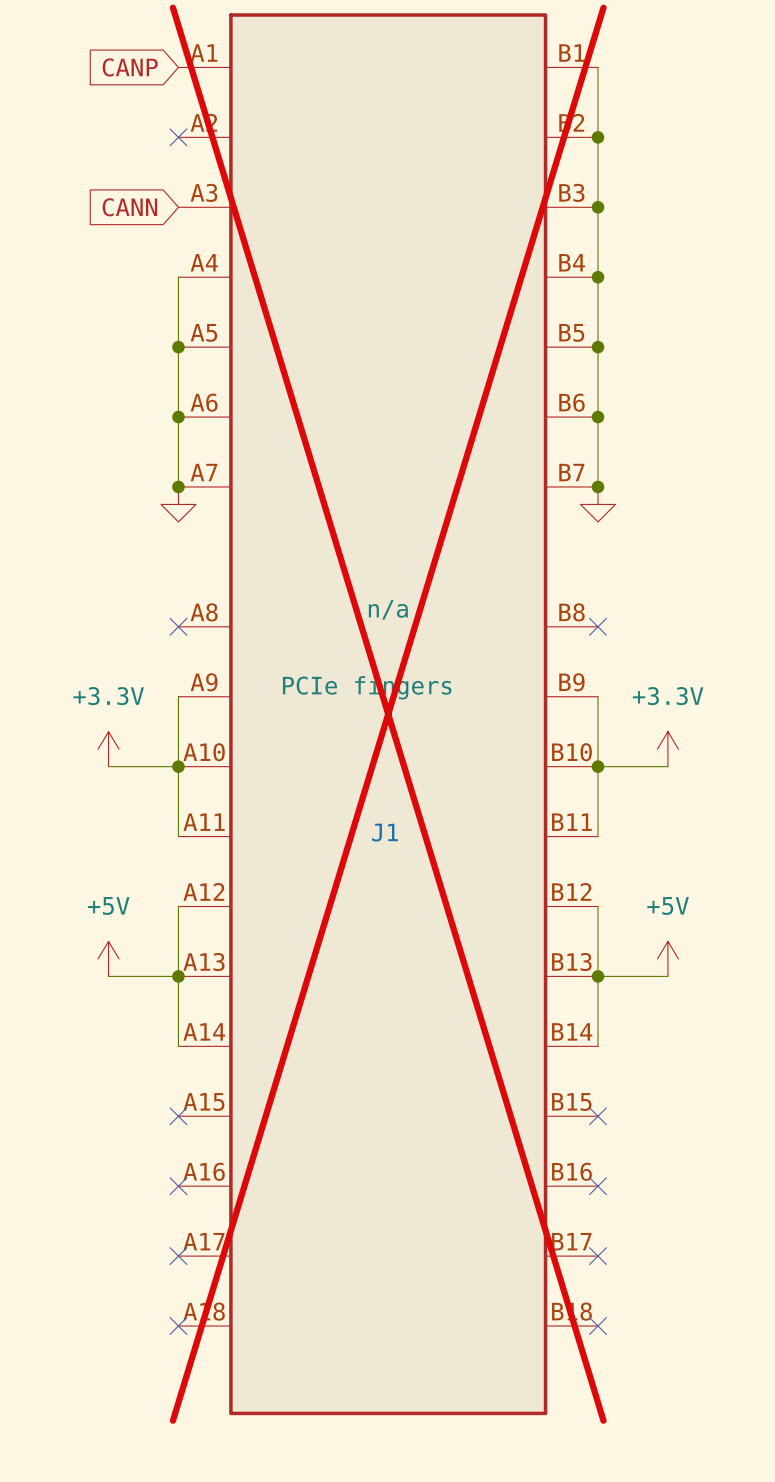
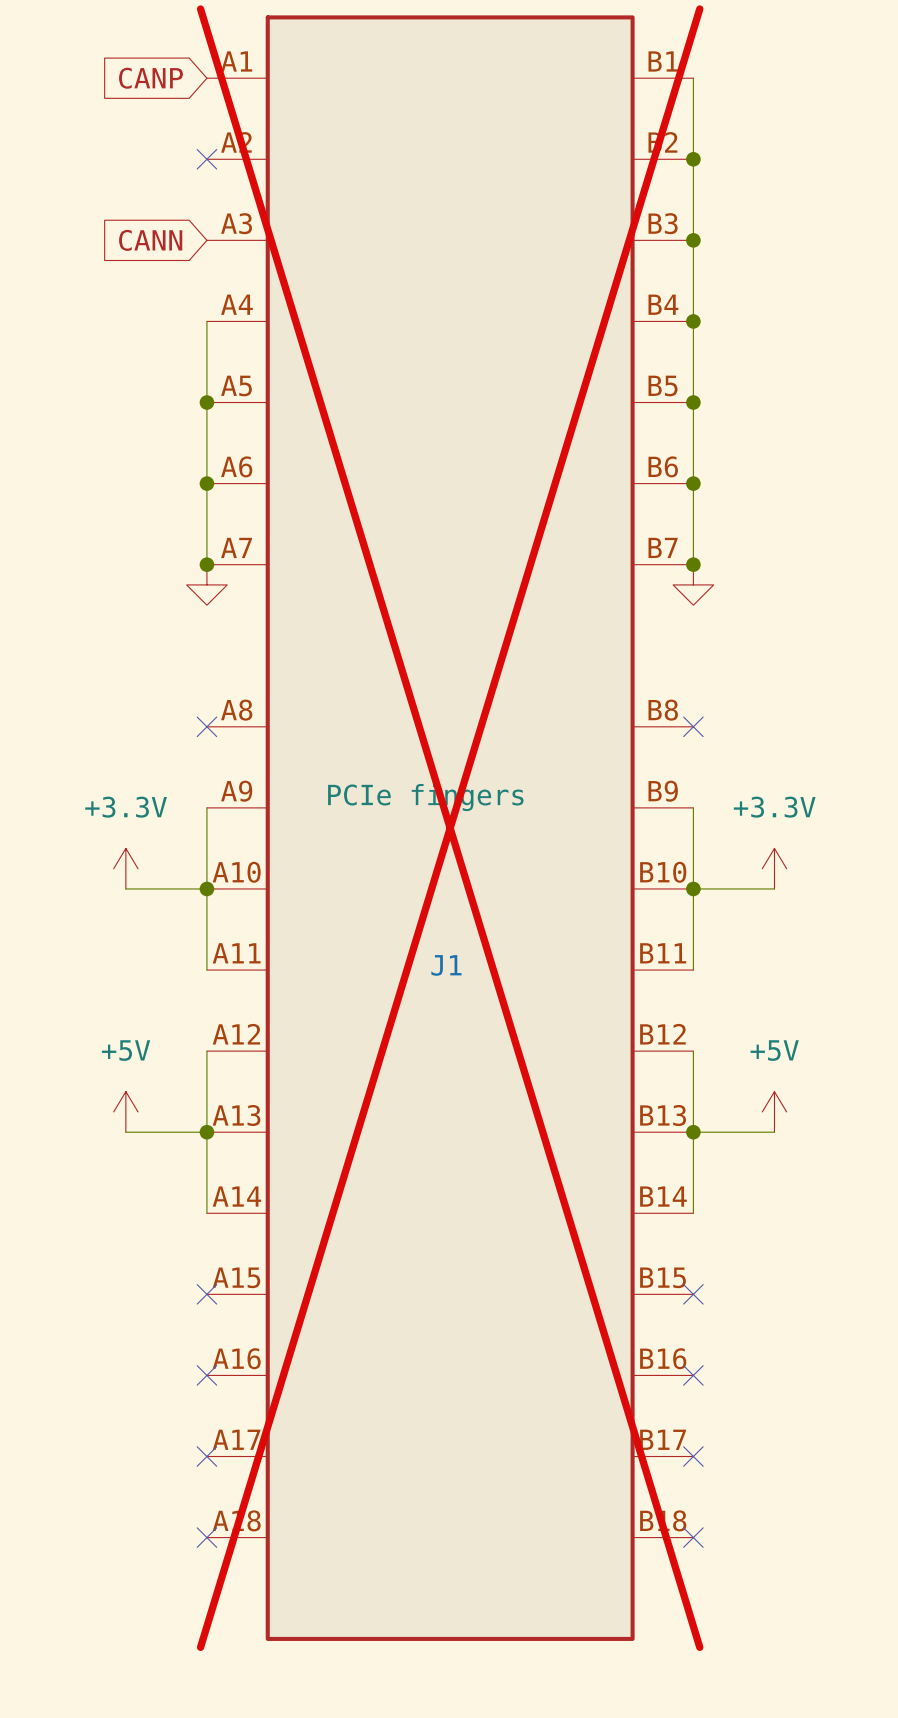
J1 text: n/a (388, 609) -> none

